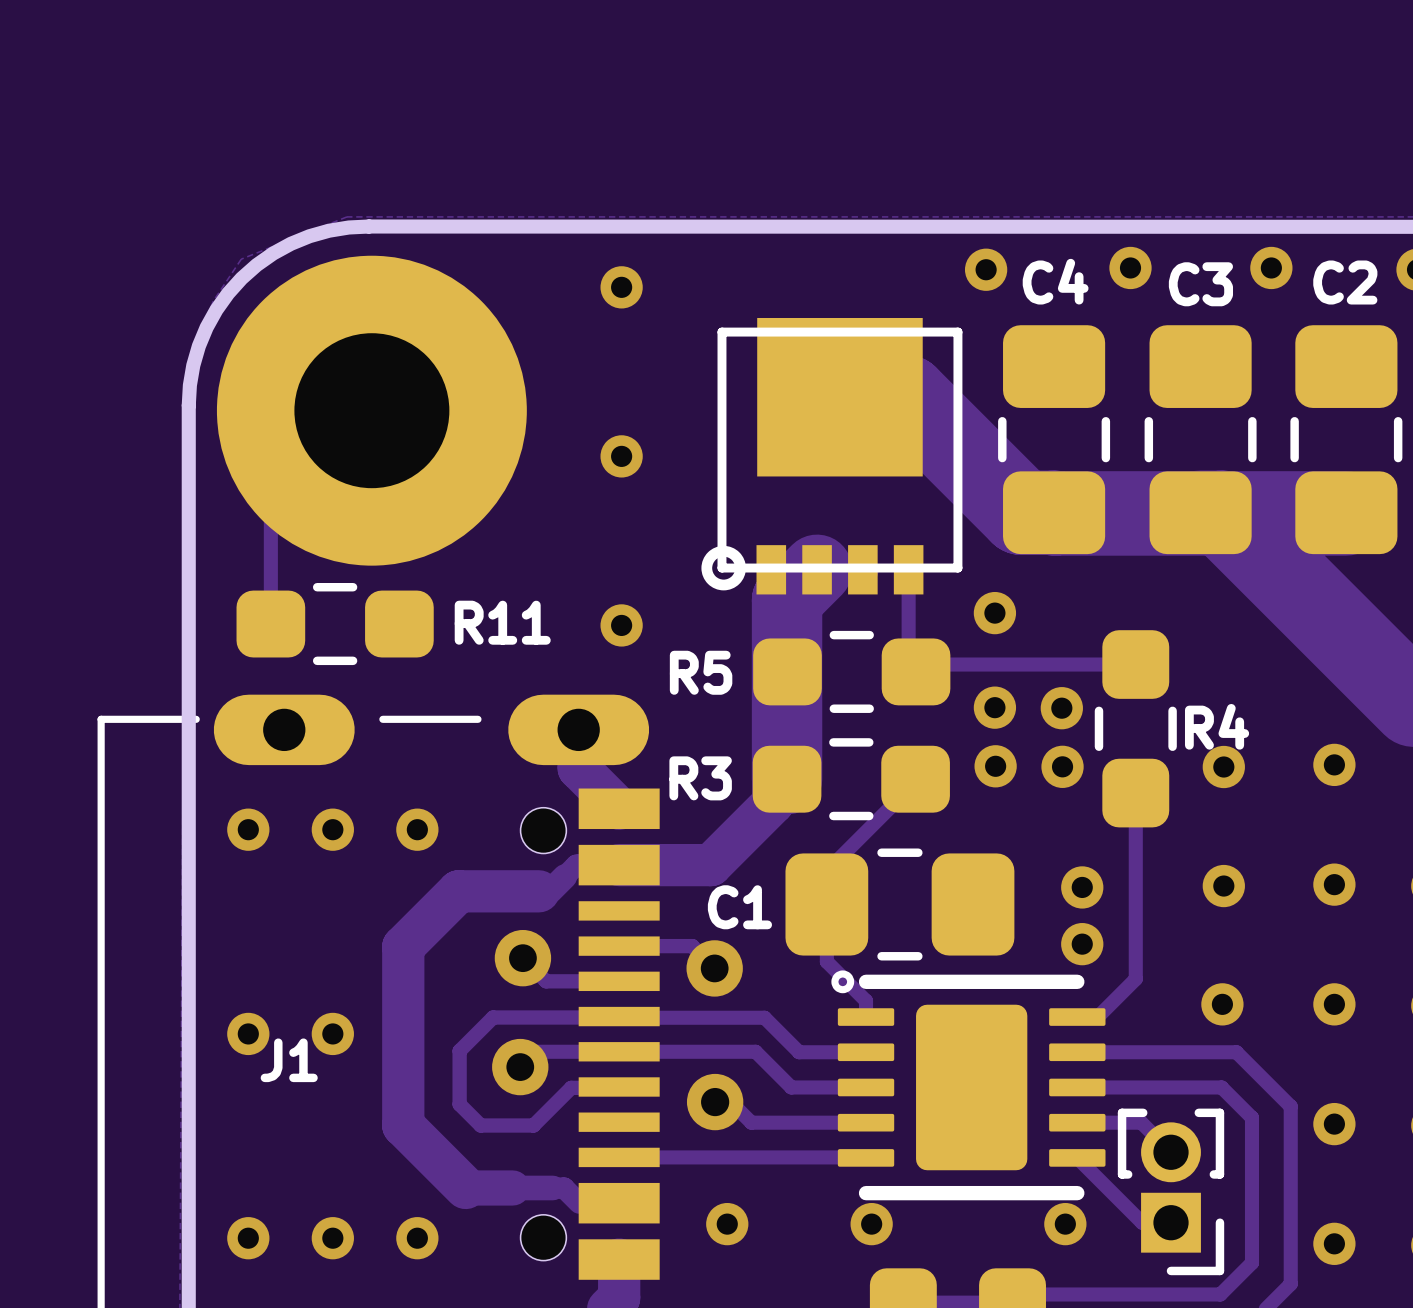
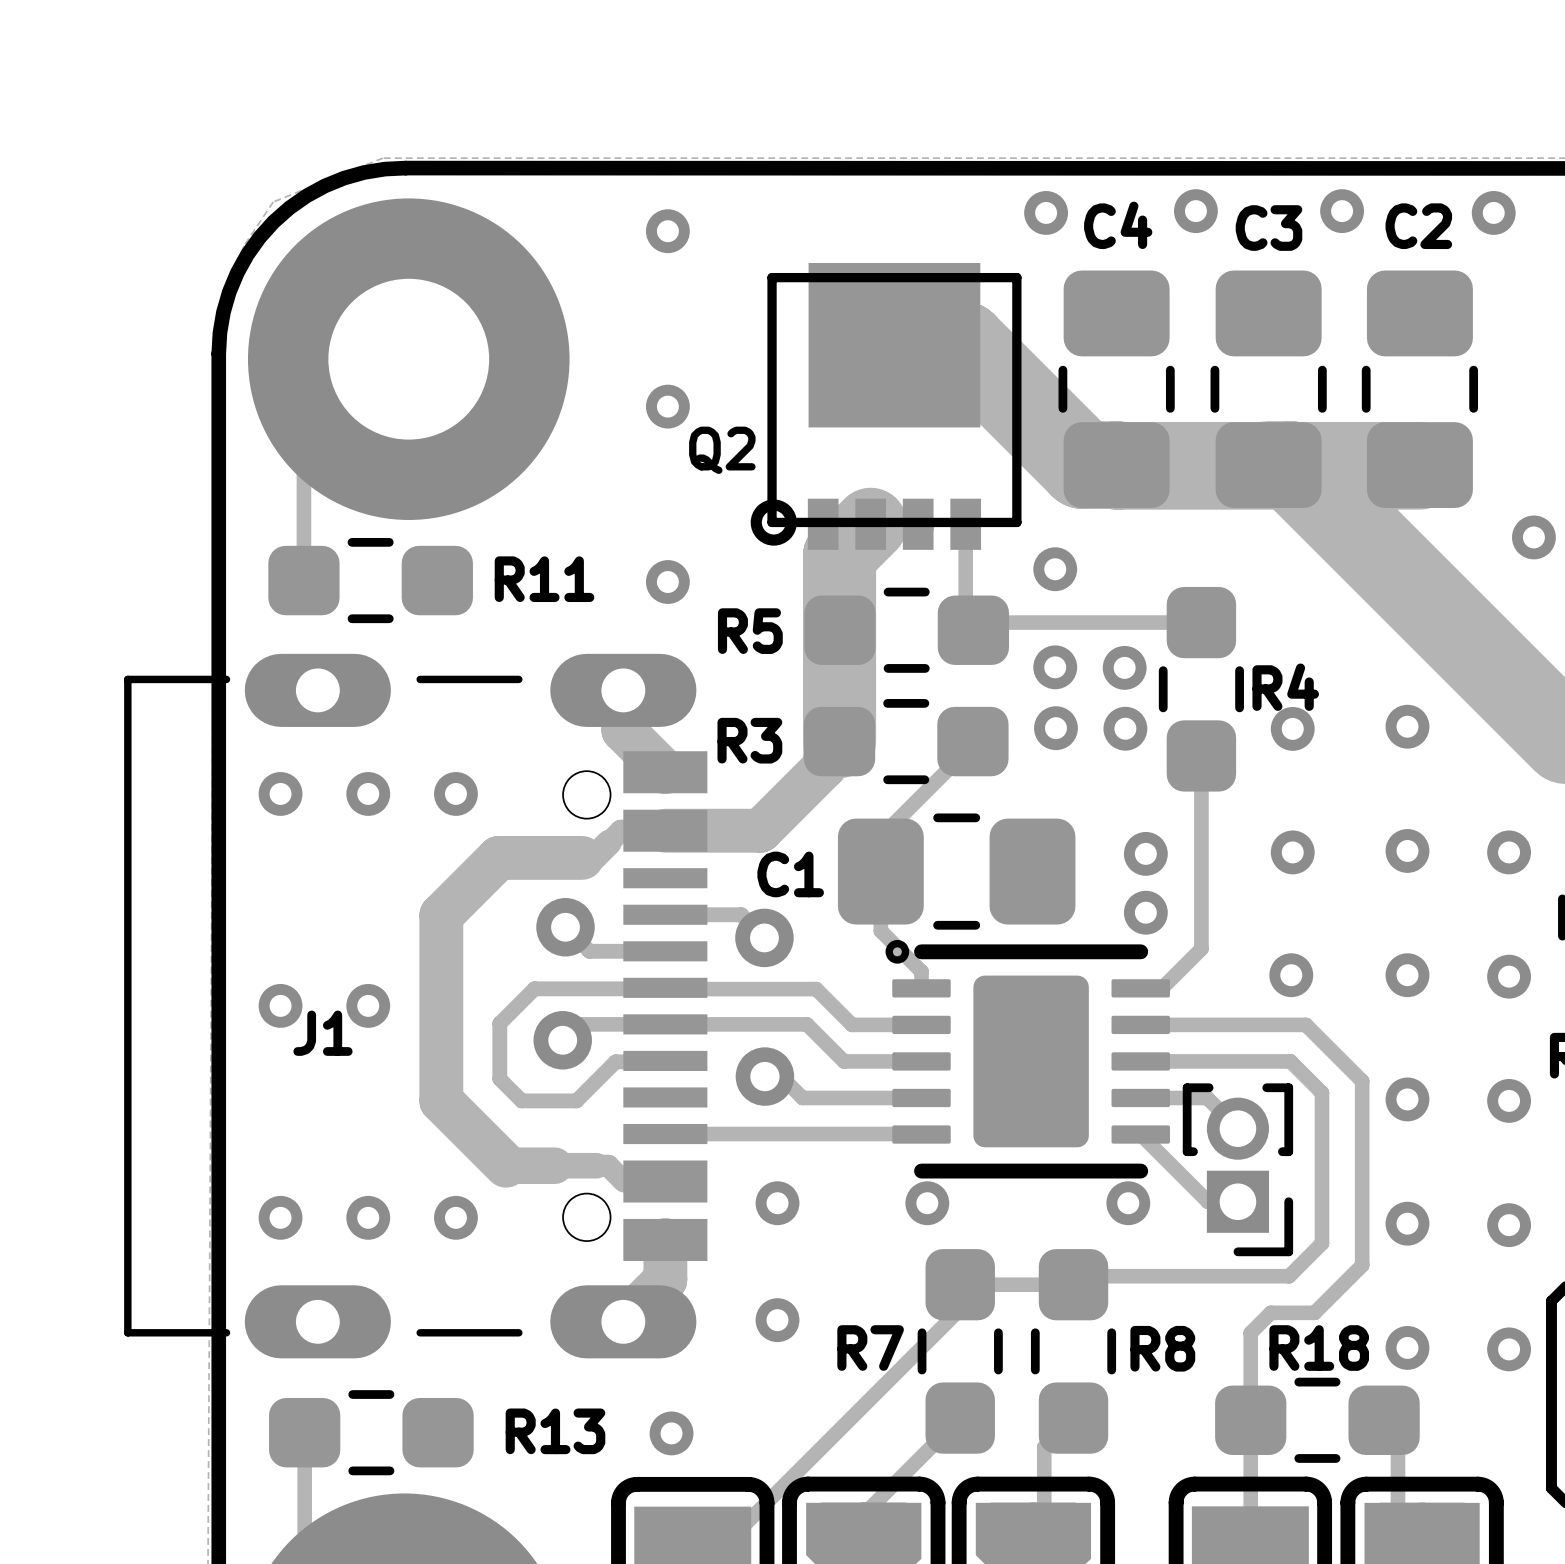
Q2 name: none -> Q2 (722, 450)

